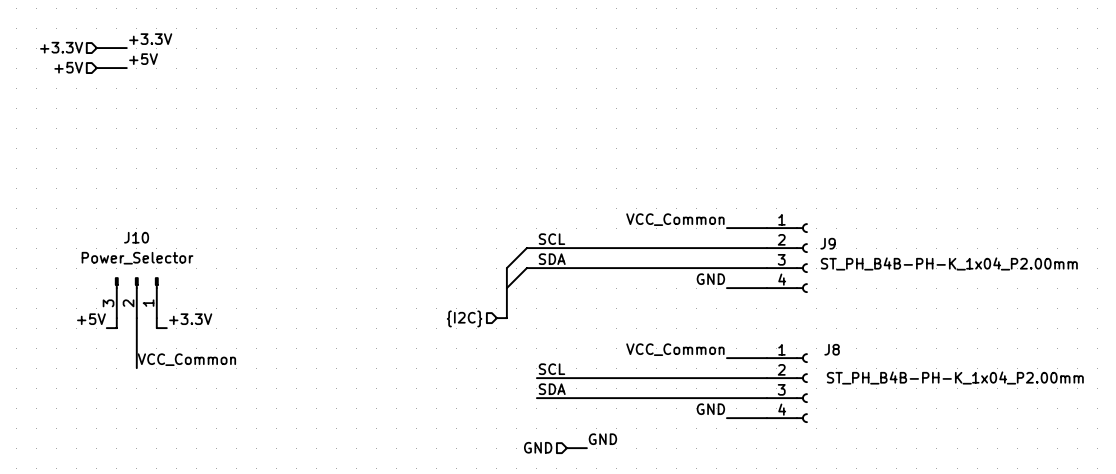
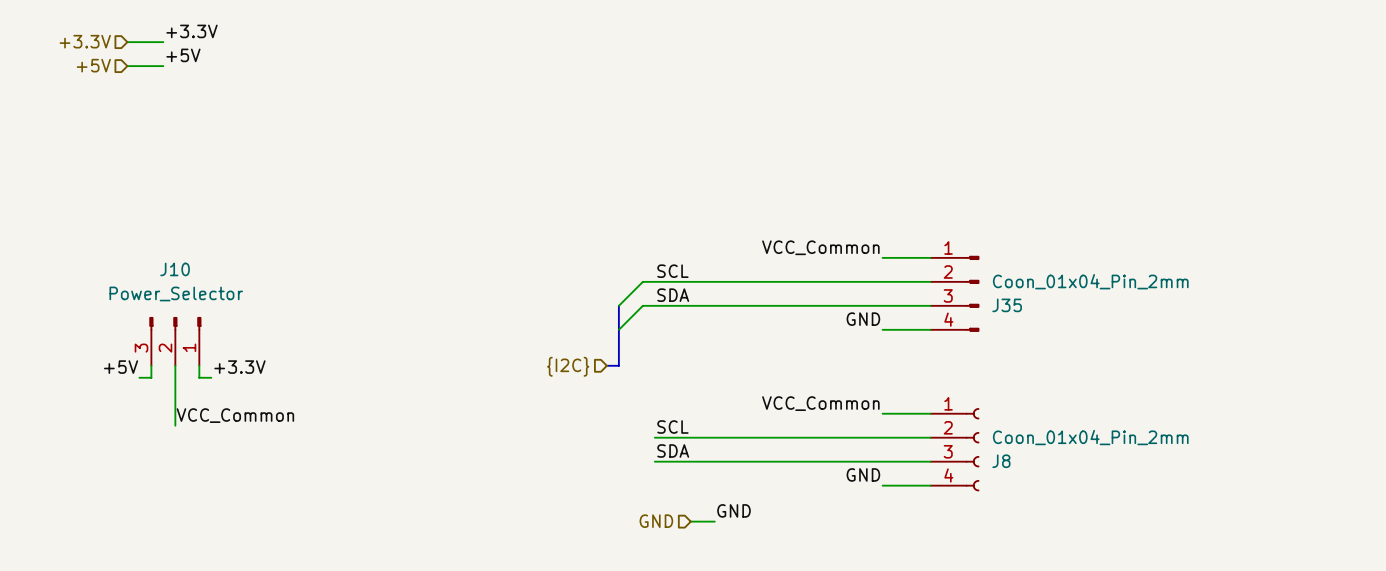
J9: ST_PH_B4B-PH-K_1x04_P2.00mm (787, 258) -> none
J35: none -> Coon_01x04_Pin_2mm (954, 293)
J8 name position: J8 (832, 349) -> J8 (1001, 461)
J8 value: ST_PH_B4B-PH-K_1x04_P2.00mm (955, 377) -> Coon_01x04_Pin_2mm (1090, 437)

